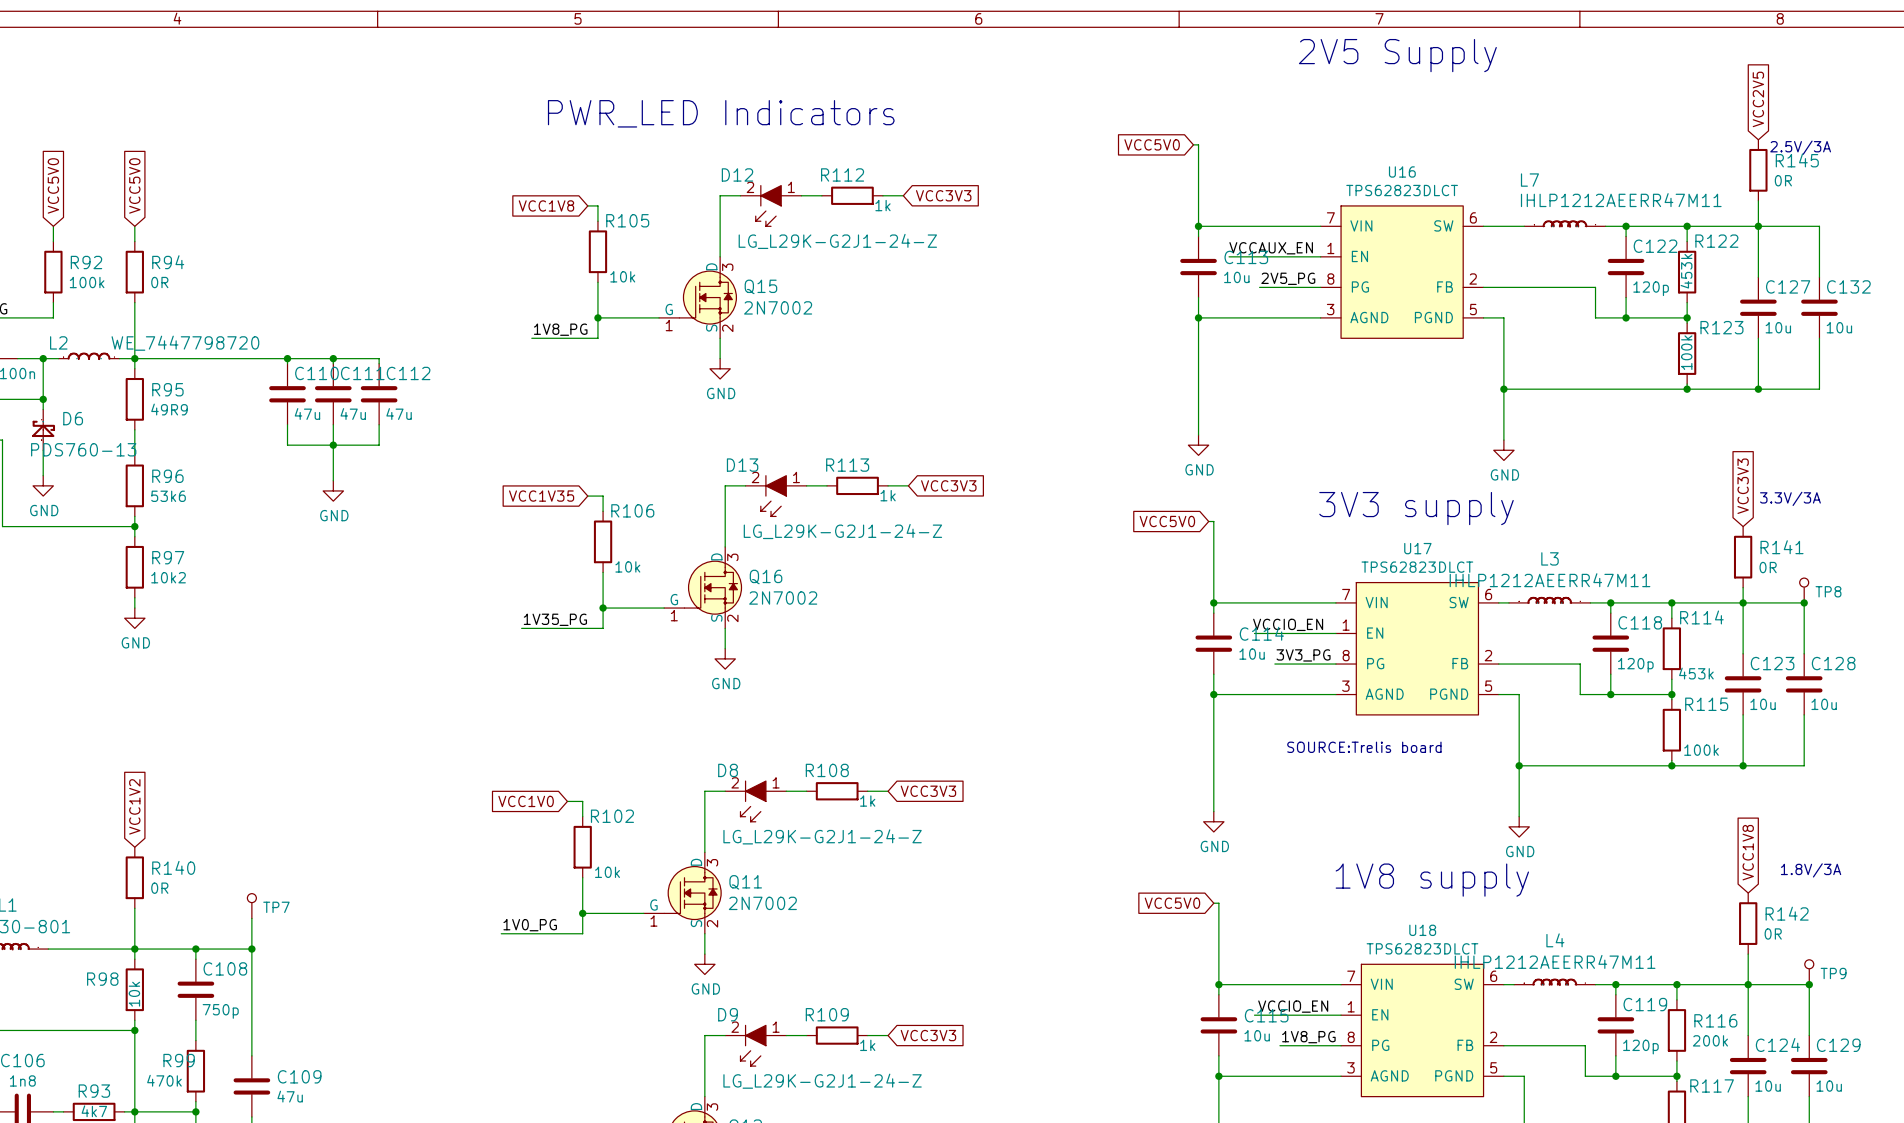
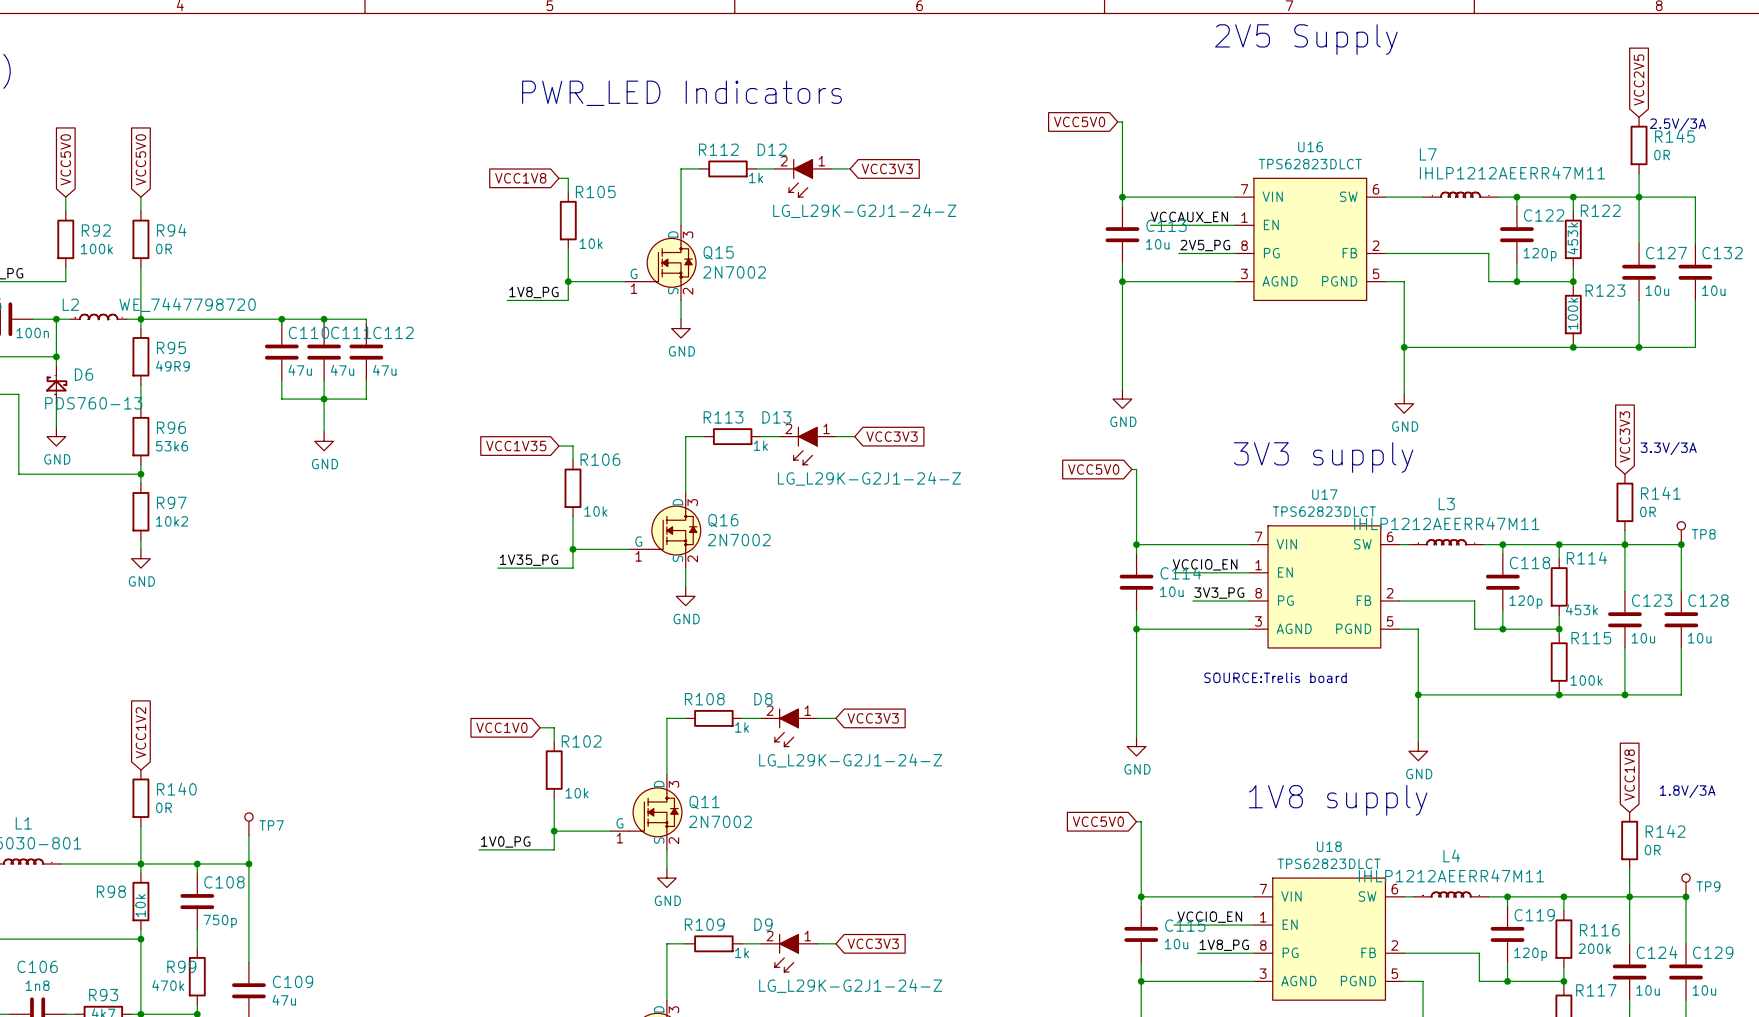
R112 position: (852, 195) -> (727, 168)
D12 position: (771, 205) -> (803, 178)
R113 position: (857, 485) -> (732, 436)
D13 position: (776, 496) -> (807, 446)
R108 position: (837, 791) -> (713, 718)
D8 position: (755, 801) -> (789, 727)
R109 position: (837, 1035) -> (713, 943)
D9 position: (755, 1045) -> (789, 953)

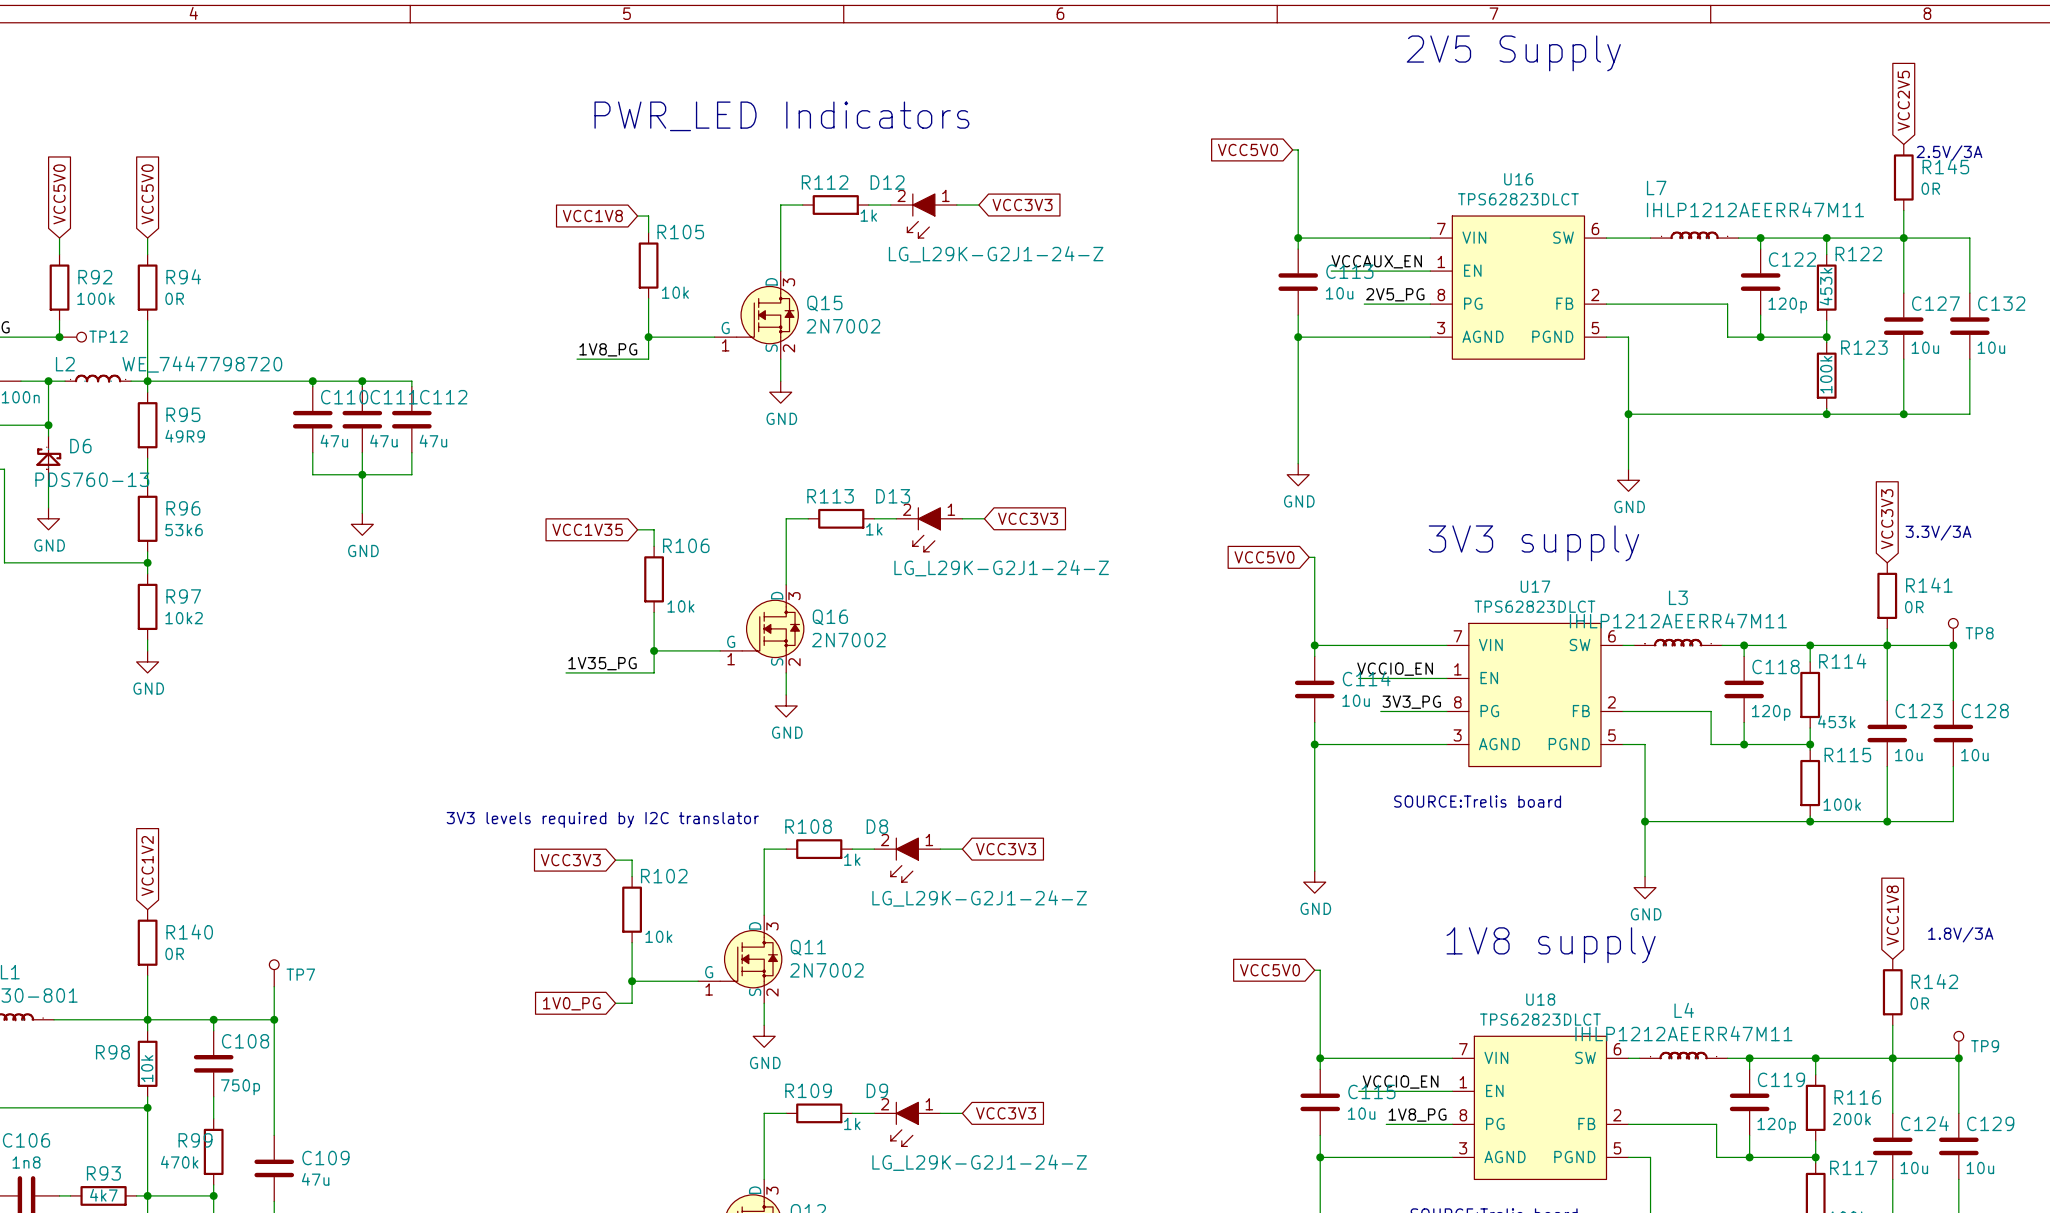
junction: none -> (59, 337)
TP12: none -> (72, 337)
text: none -> 3V3 levels required by I2C translator (602, 819)
global label: VCC1V0 (501, 727) -> VCC3V3 (570, 860)
label: 1V0_PG (505, 841) -> none
wire: (479, 849) (540, 849) -> none
global label: none -> 1V0_PG (571, 1003)

